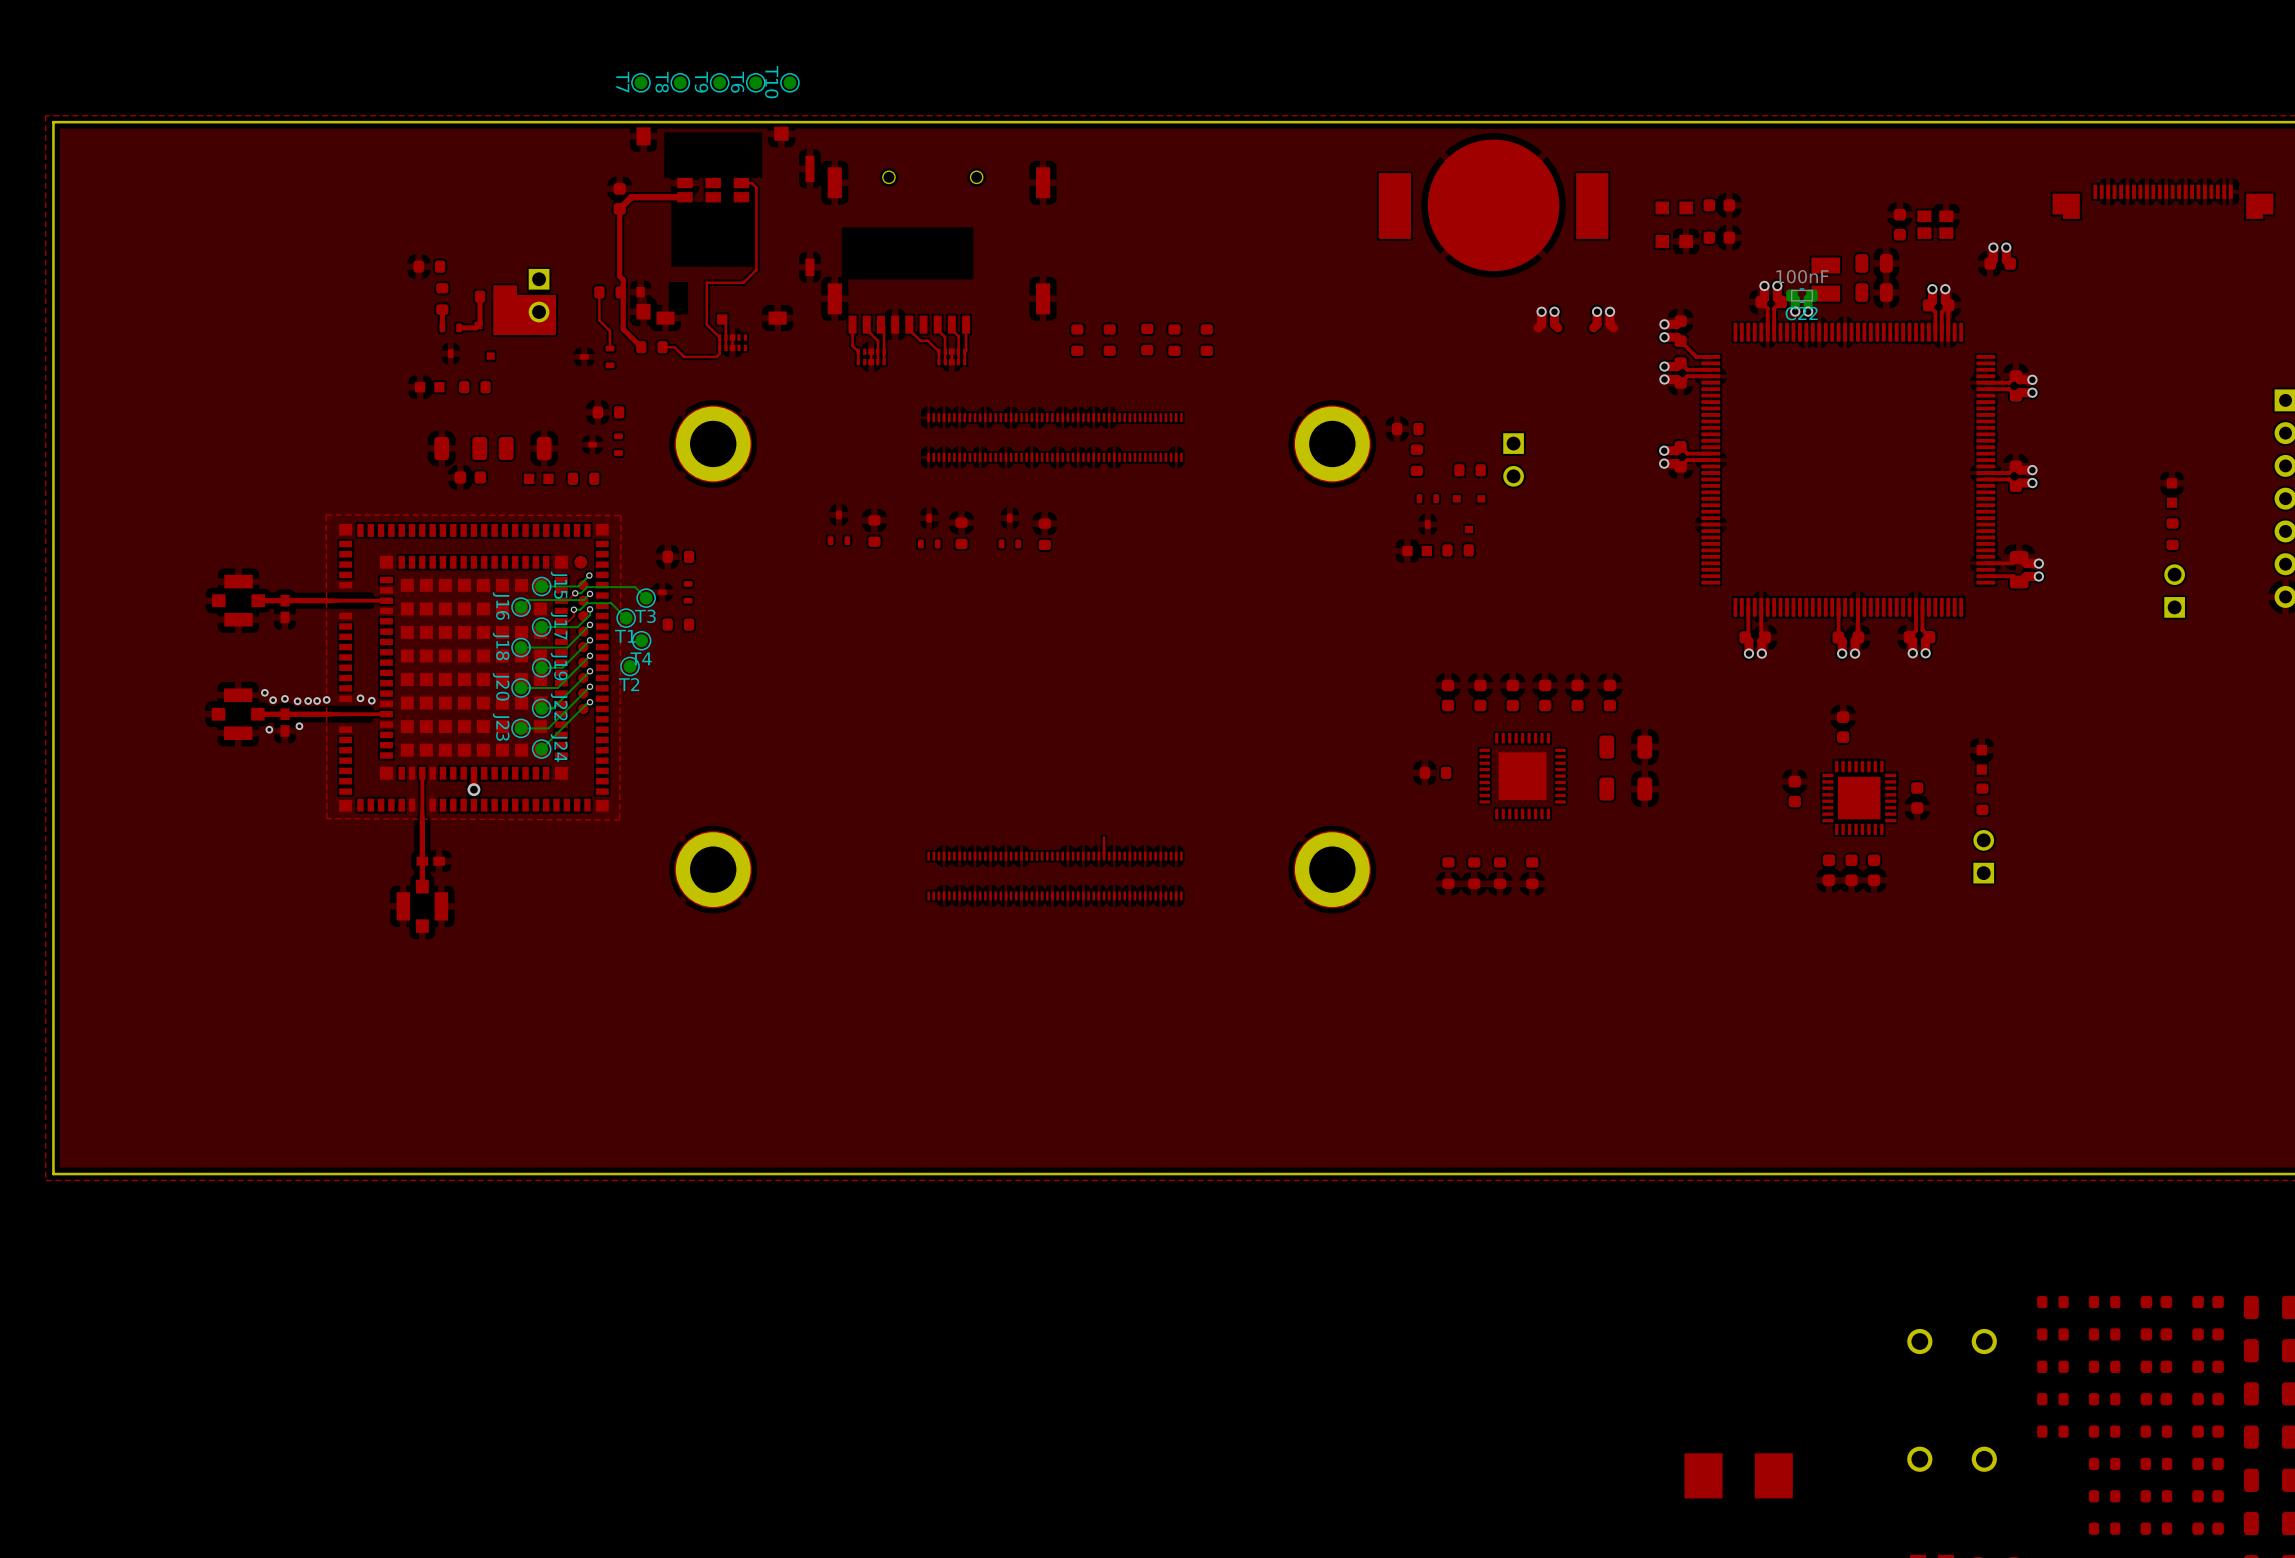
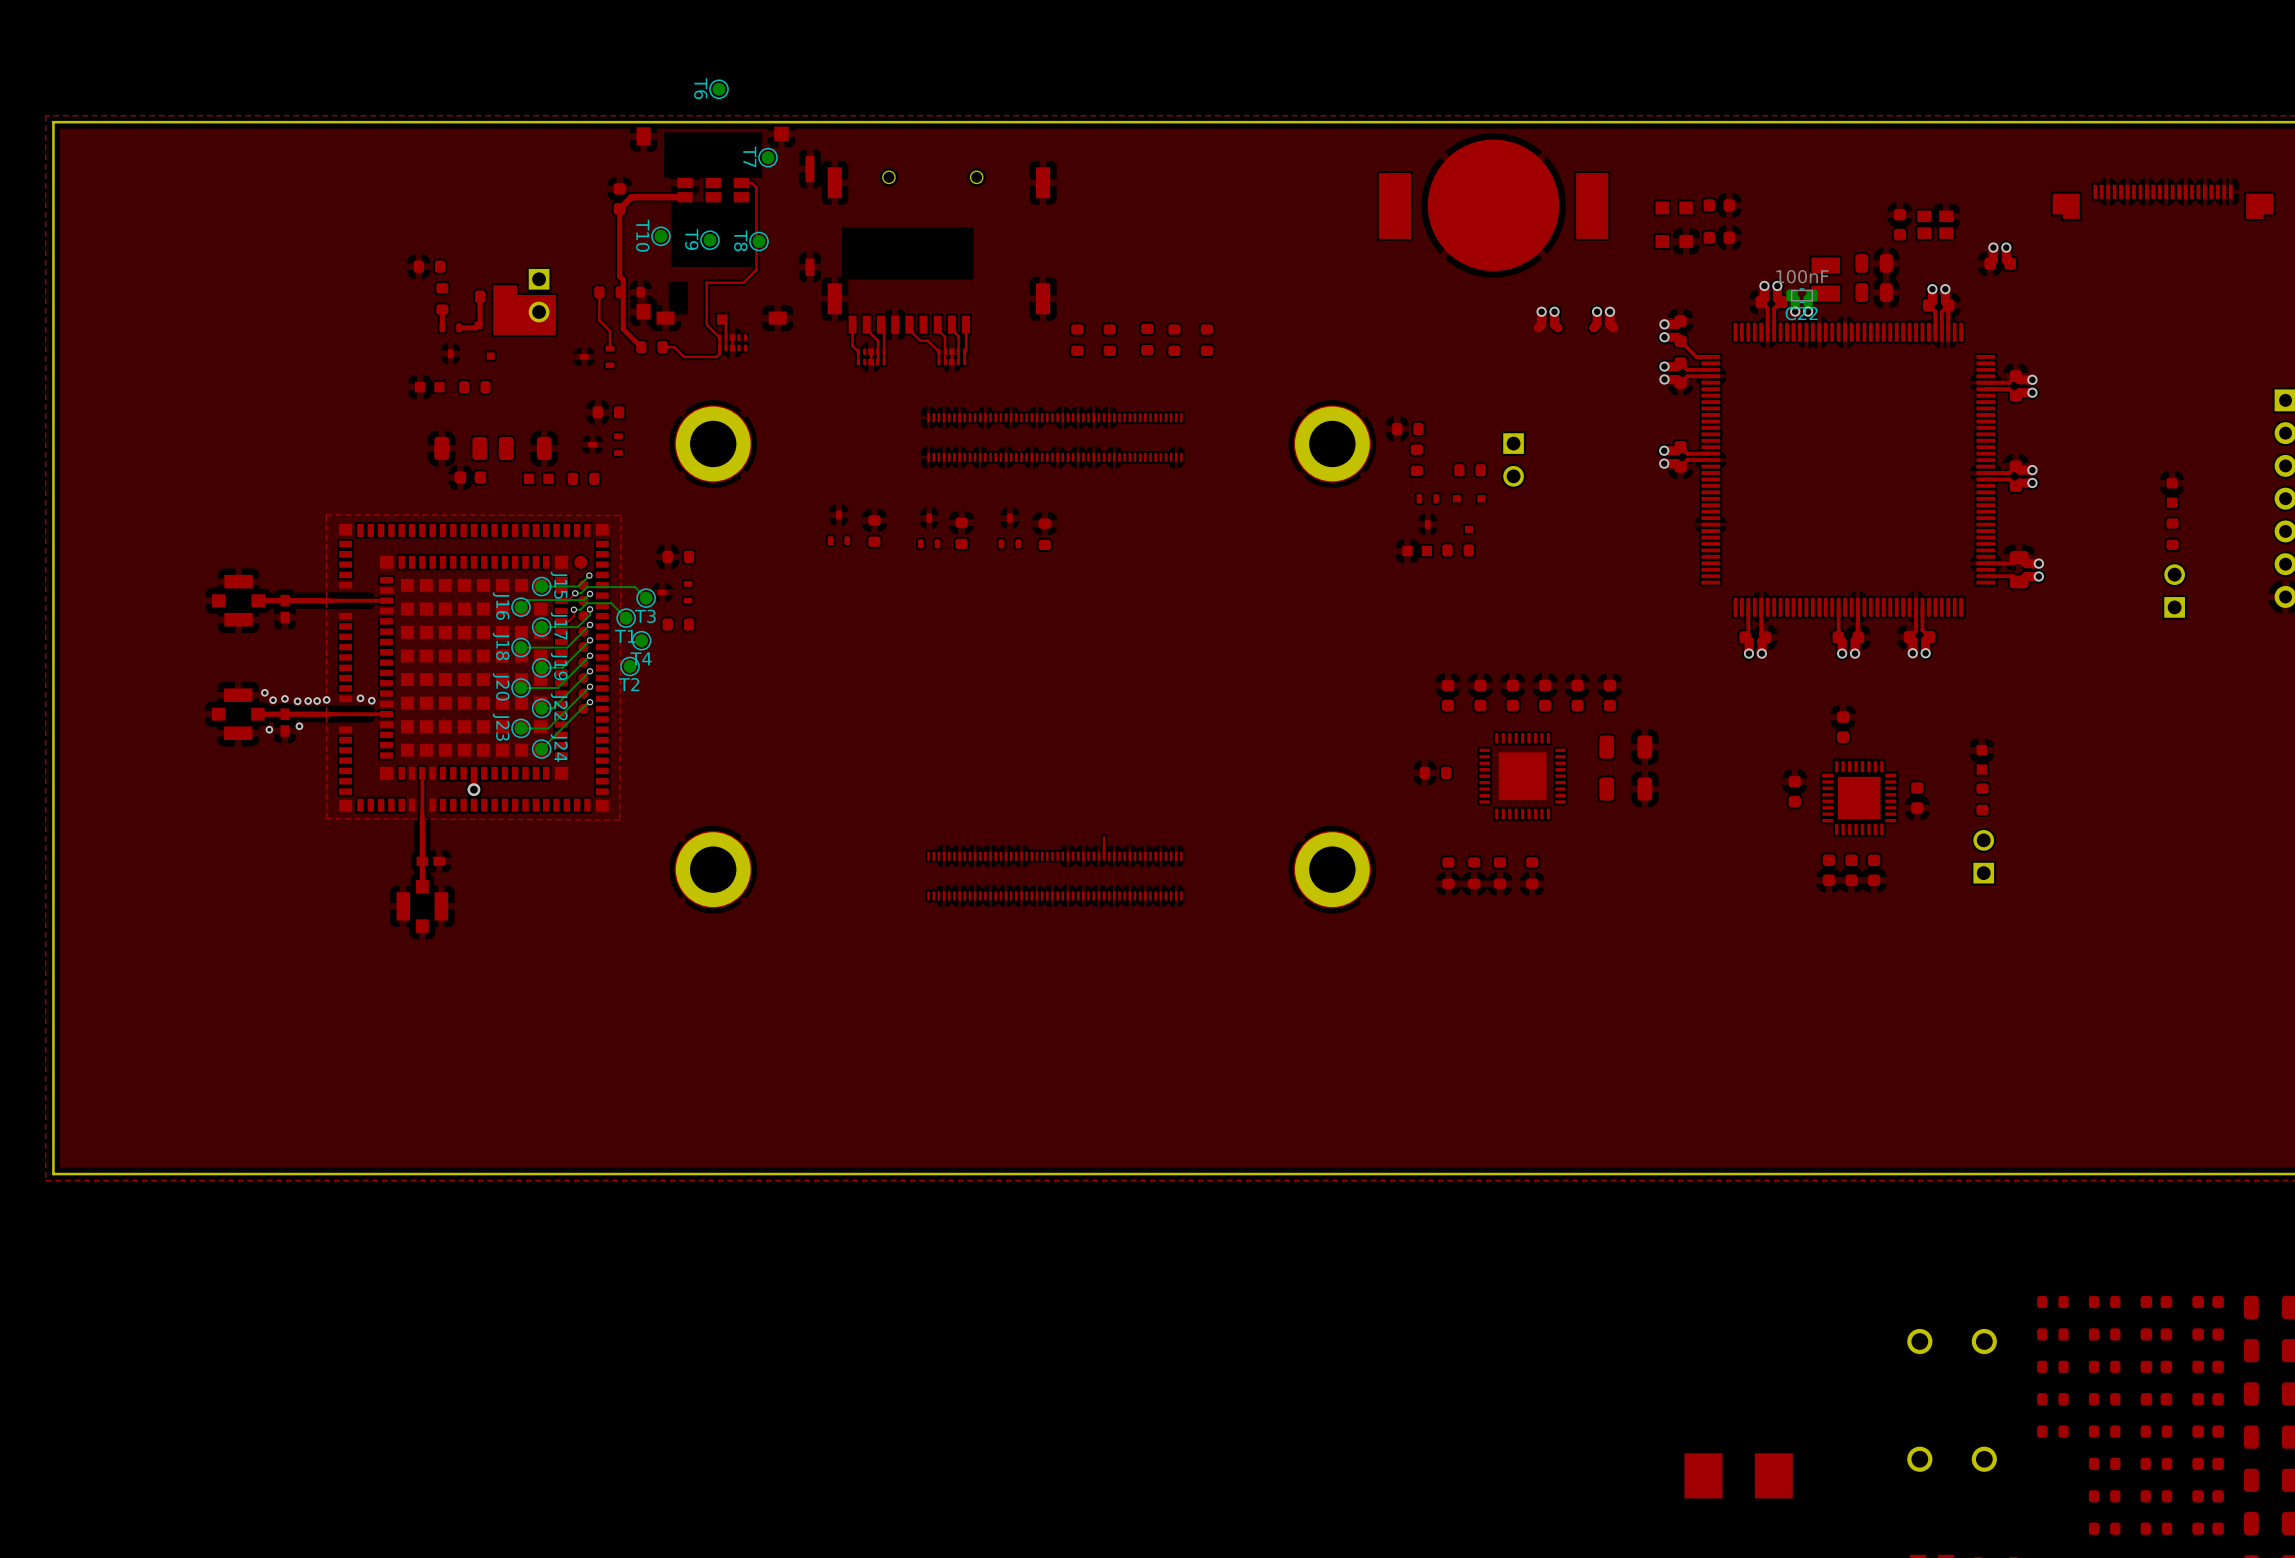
T7 position: (640, 82) -> (768, 157)
T8 position: (680, 82) -> (759, 241)
T9 position: (719, 82) -> (709, 240)
T6 position: (755, 82) -> (719, 89)
T10 position: (789, 82) -> (660, 236)

